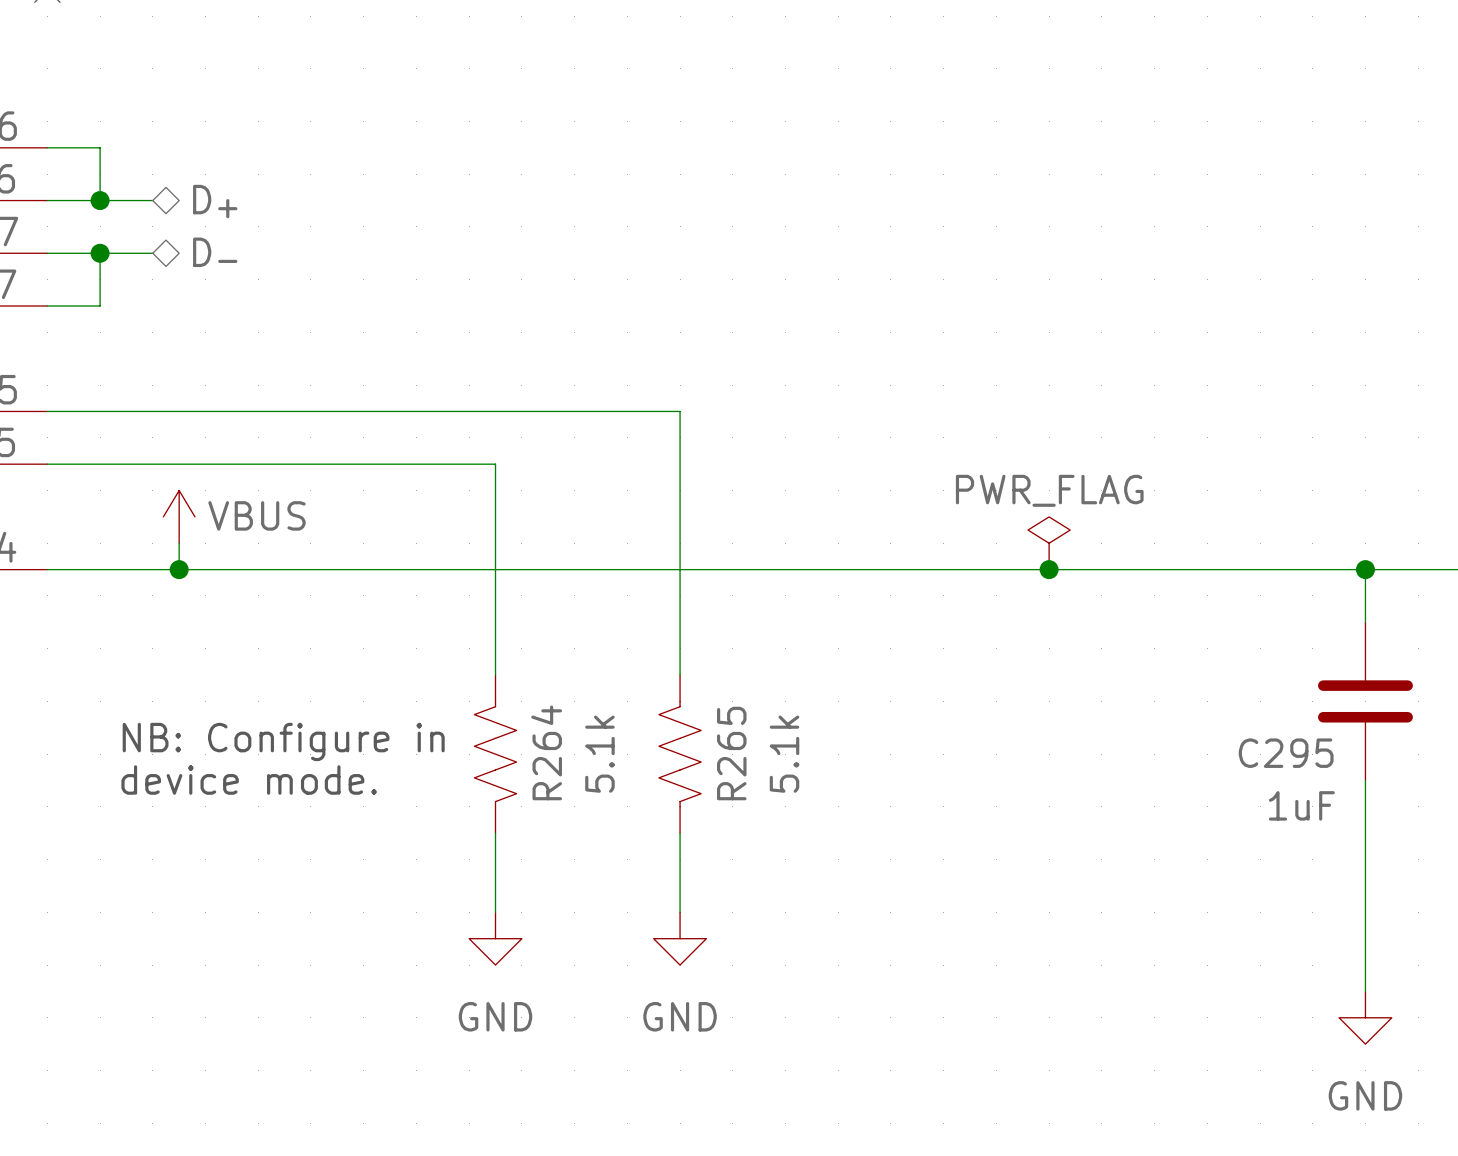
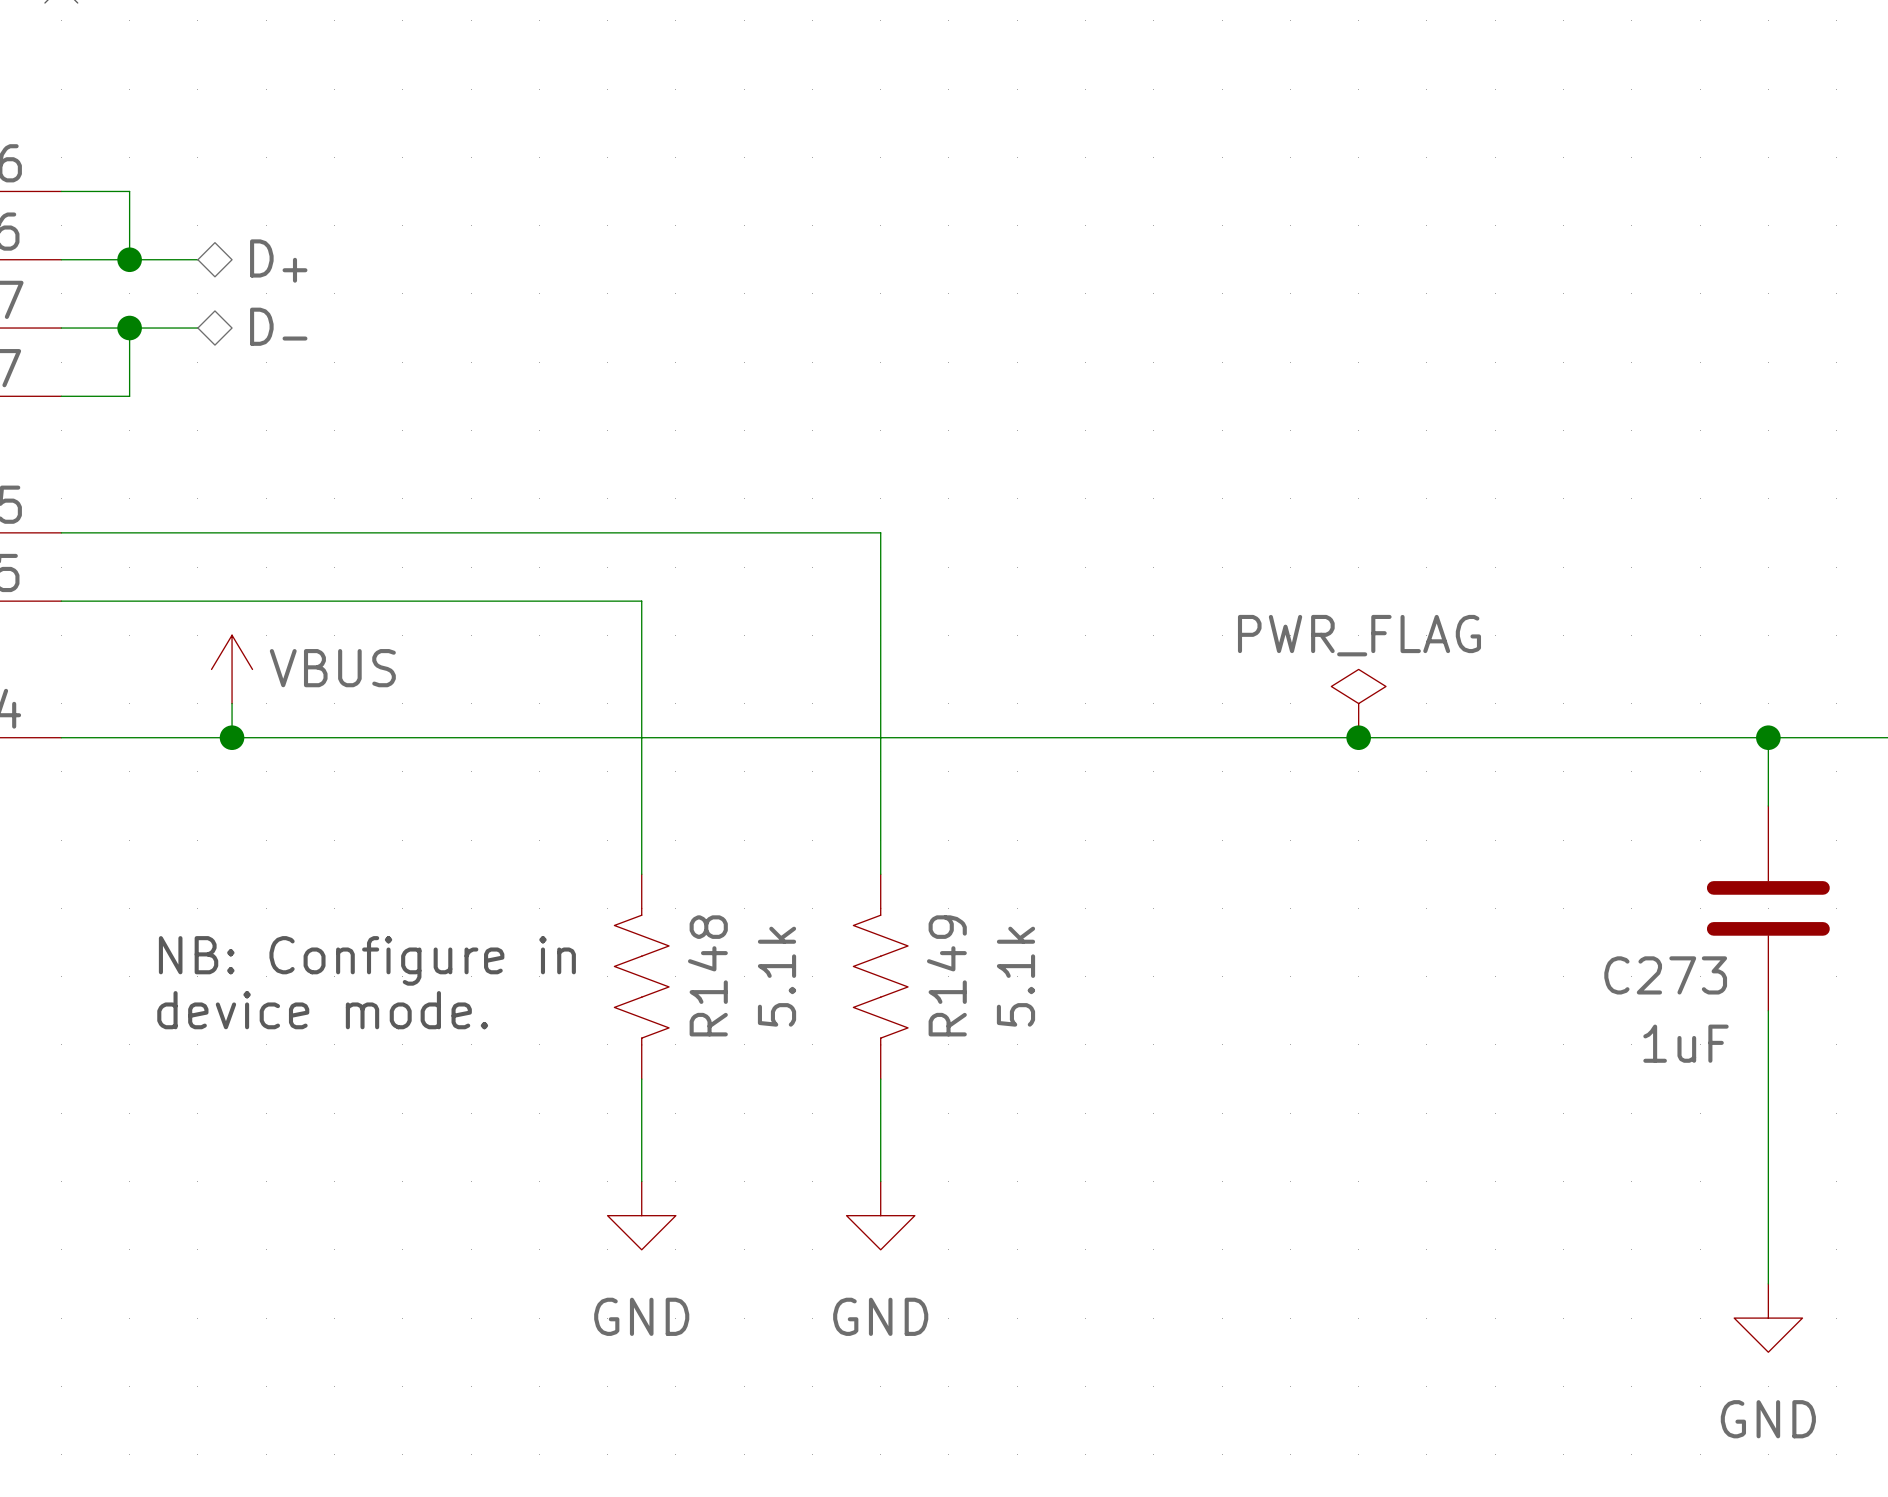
R264 name: R264 (546, 752) -> R148 (707, 975)
R265 name: R265 (731, 753) -> R149 (946, 975)
C295 name: C295 (1286, 753) -> C273 (1665, 975)

